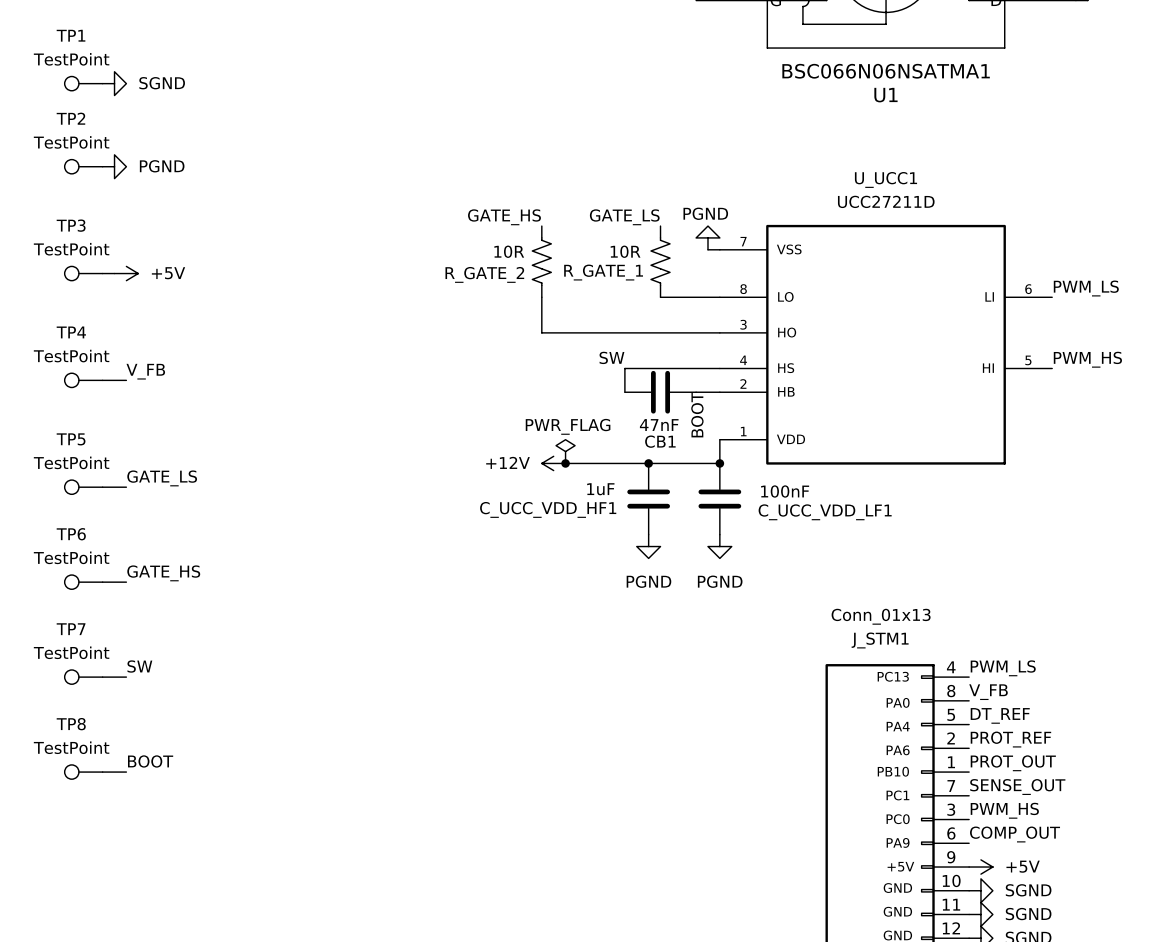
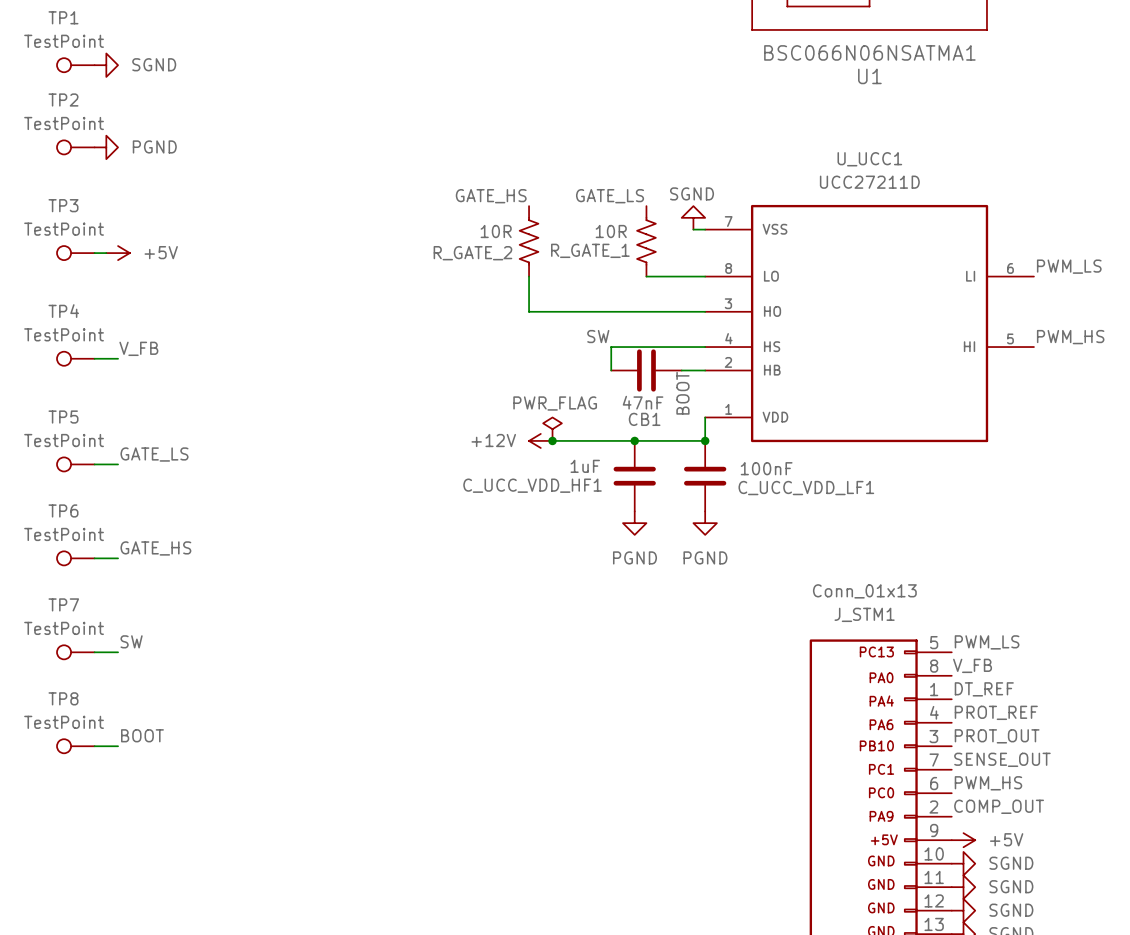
power symbol: PGND (707, 237) -> SGND (693, 217)
J_STM1 pin number: 4 (951, 667) -> 5 (934, 642)
J_STM1 pin number: 5 (951, 714) -> 1 (934, 689)
J_STM1 pin number: 2 (951, 738) -> 4 (934, 712)
J_STM1 pin number: 1 (951, 762) -> 3 (933, 736)
J_STM1 pin number: 3 (951, 809) -> 6 (934, 783)
J_STM1 pin number: 6 (951, 833) -> 2 (933, 807)

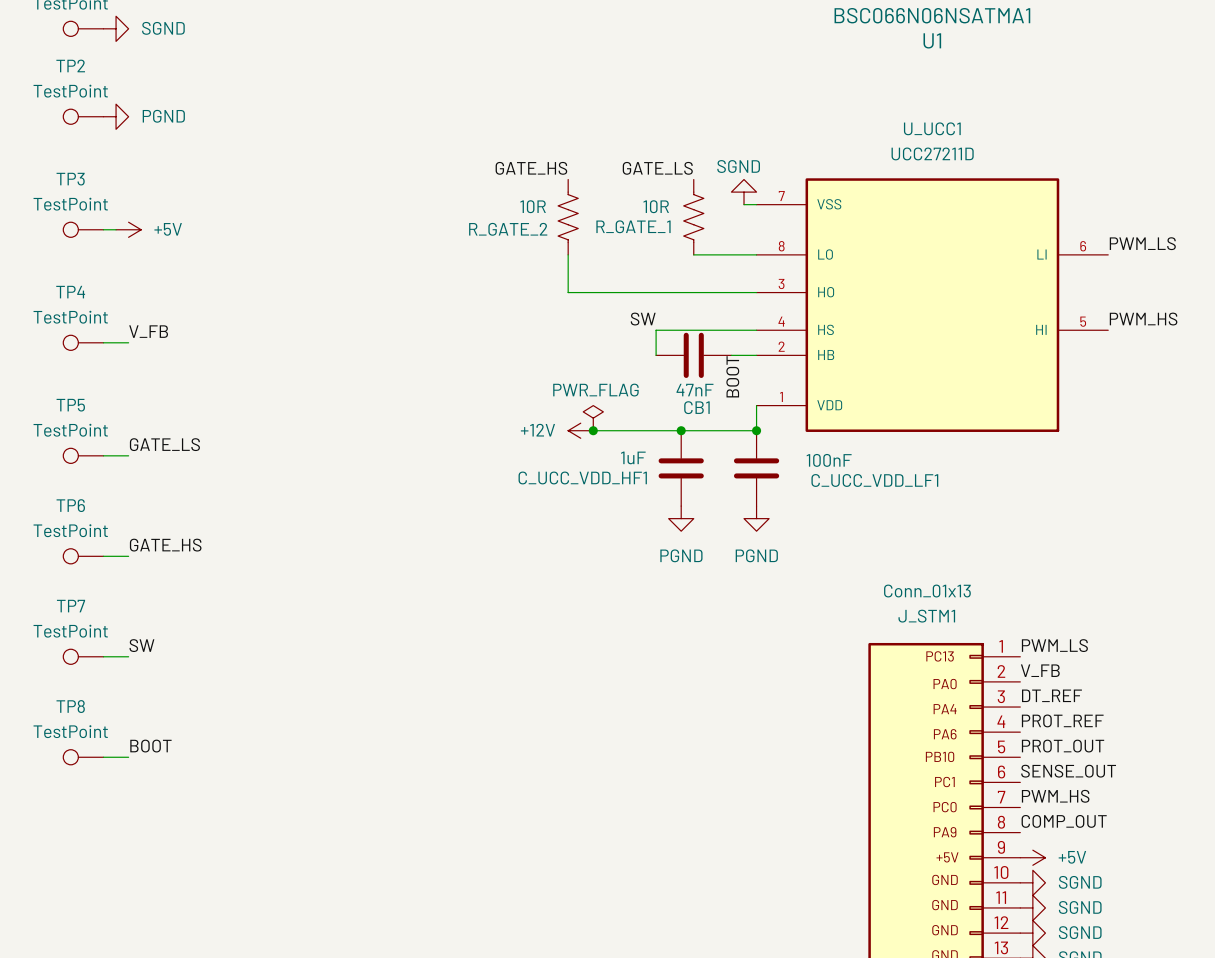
J_STM1 pin number: 5 (934, 642) -> 1 (1001, 646)
J_STM1 pin number: 8 (934, 666) -> 2 (1001, 671)
J_STM1 pin number: 1 (934, 689) -> 3 (1001, 696)
J_STM1 pin number: 3 (933, 736) -> 5 (1001, 746)
J_STM1 pin number: 7 (934, 760) -> 6 (1001, 772)
J_STM1 pin number: 6 (934, 783) -> 7 (1001, 797)
J_STM1 pin number: 2 (933, 807) -> 8 (1001, 822)

